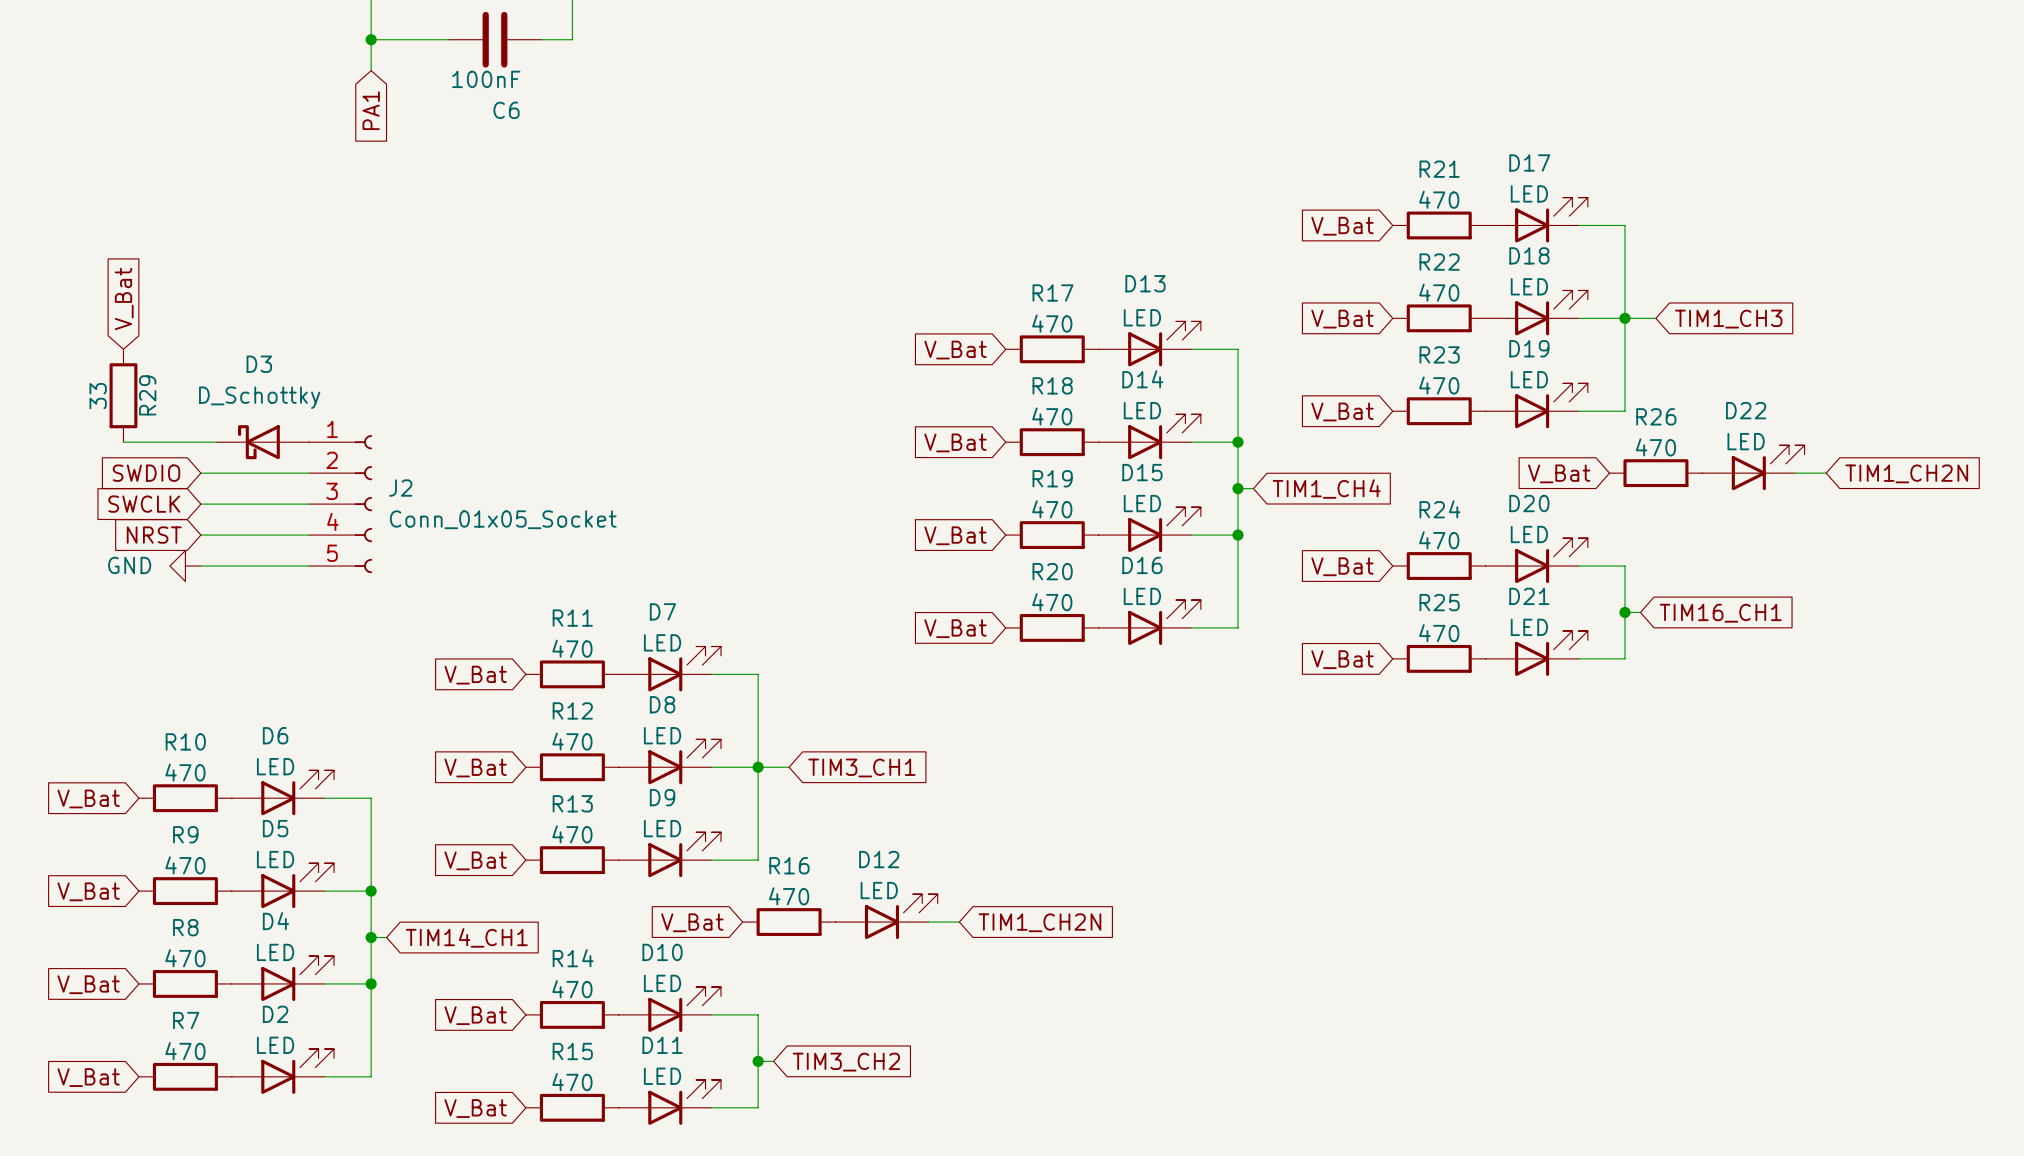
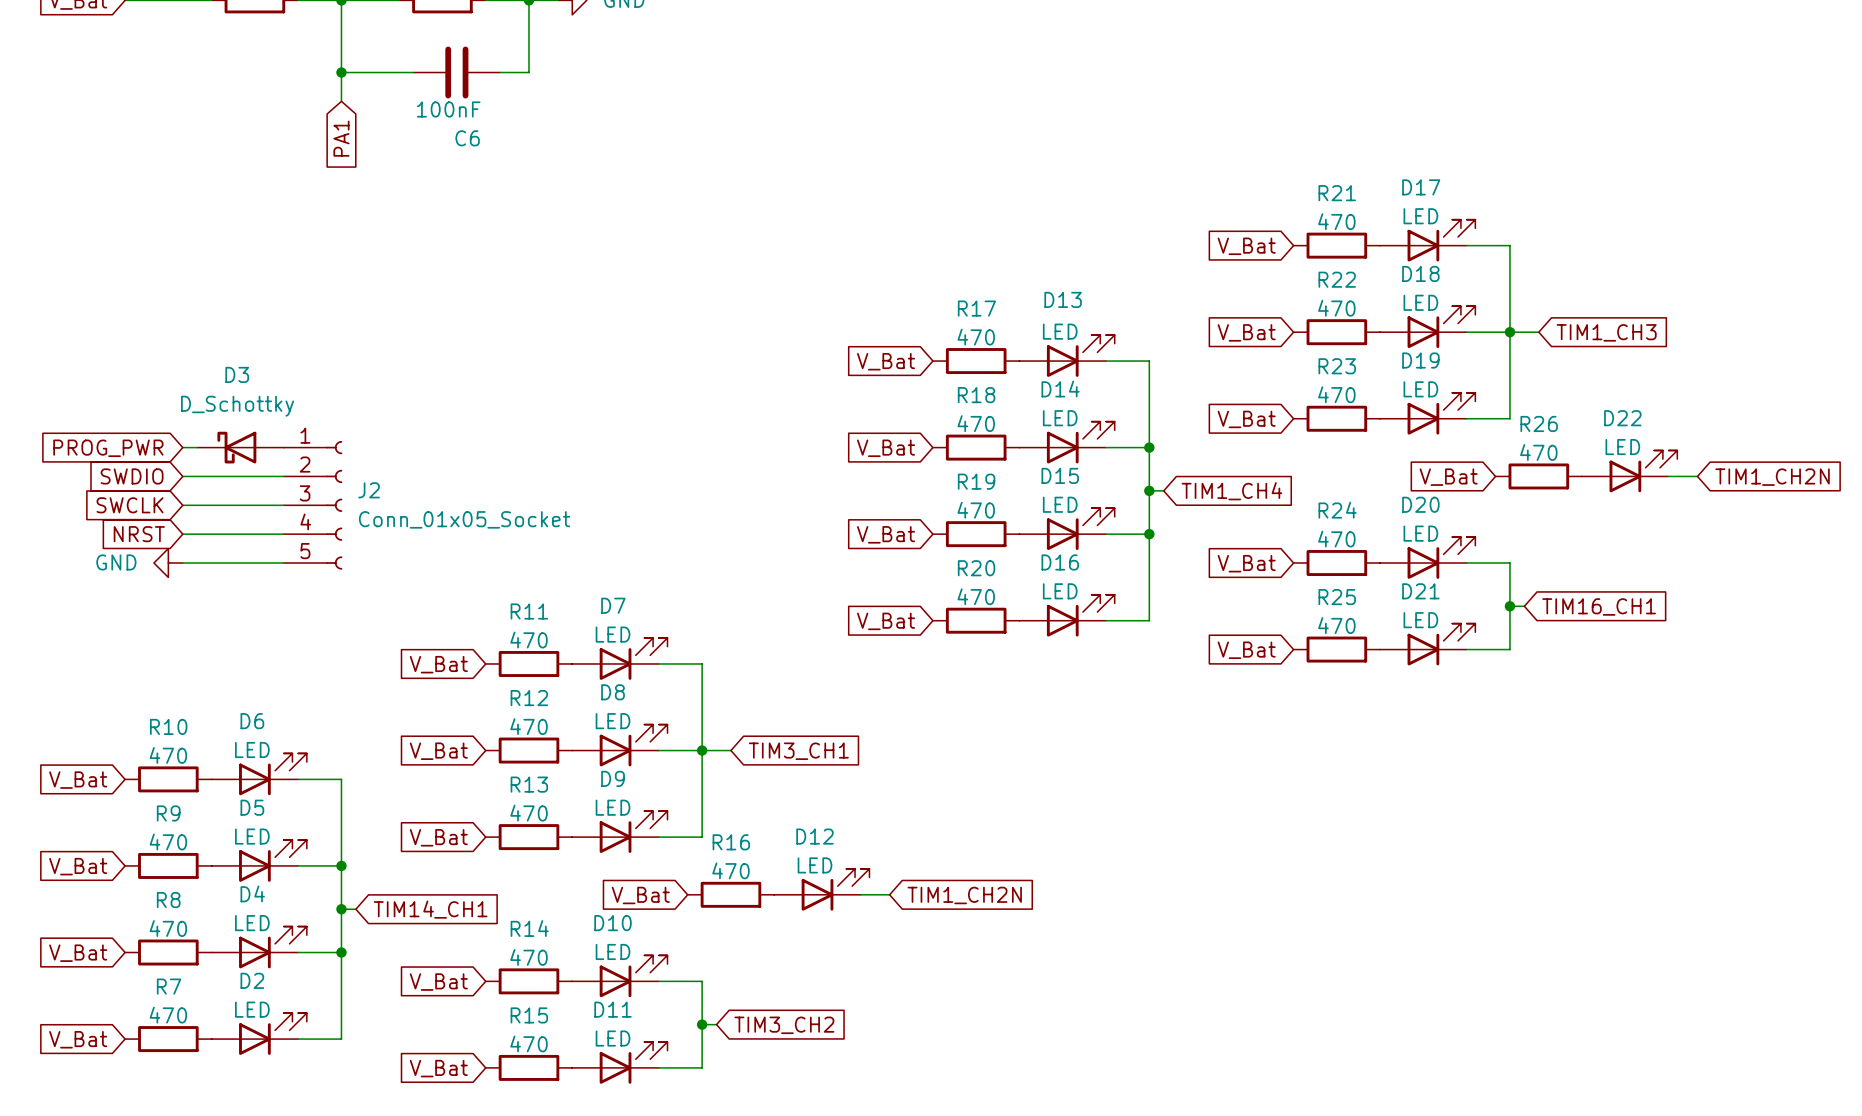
global label: V_Bat (124, 298) -> none
R29: 33 (123, 395) -> none
global label: none -> PROG_PWR (108, 448)
wire: (123, 442) (200, 442) -> none

